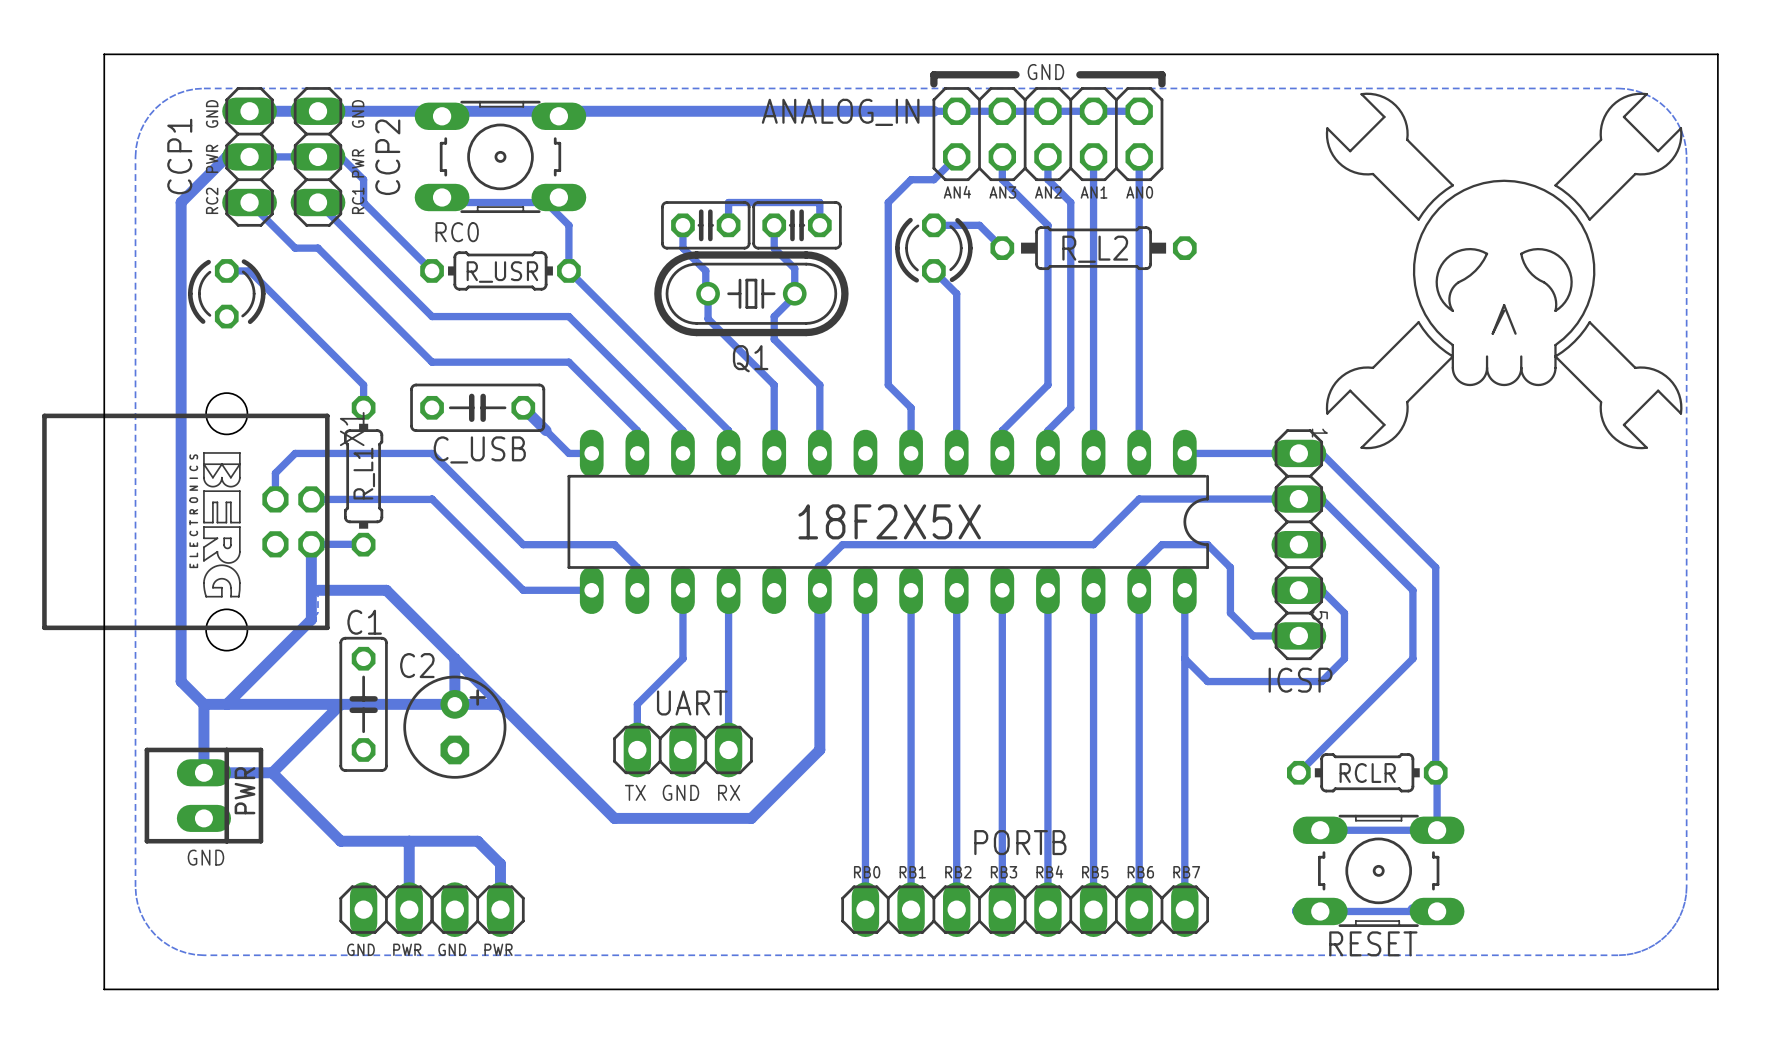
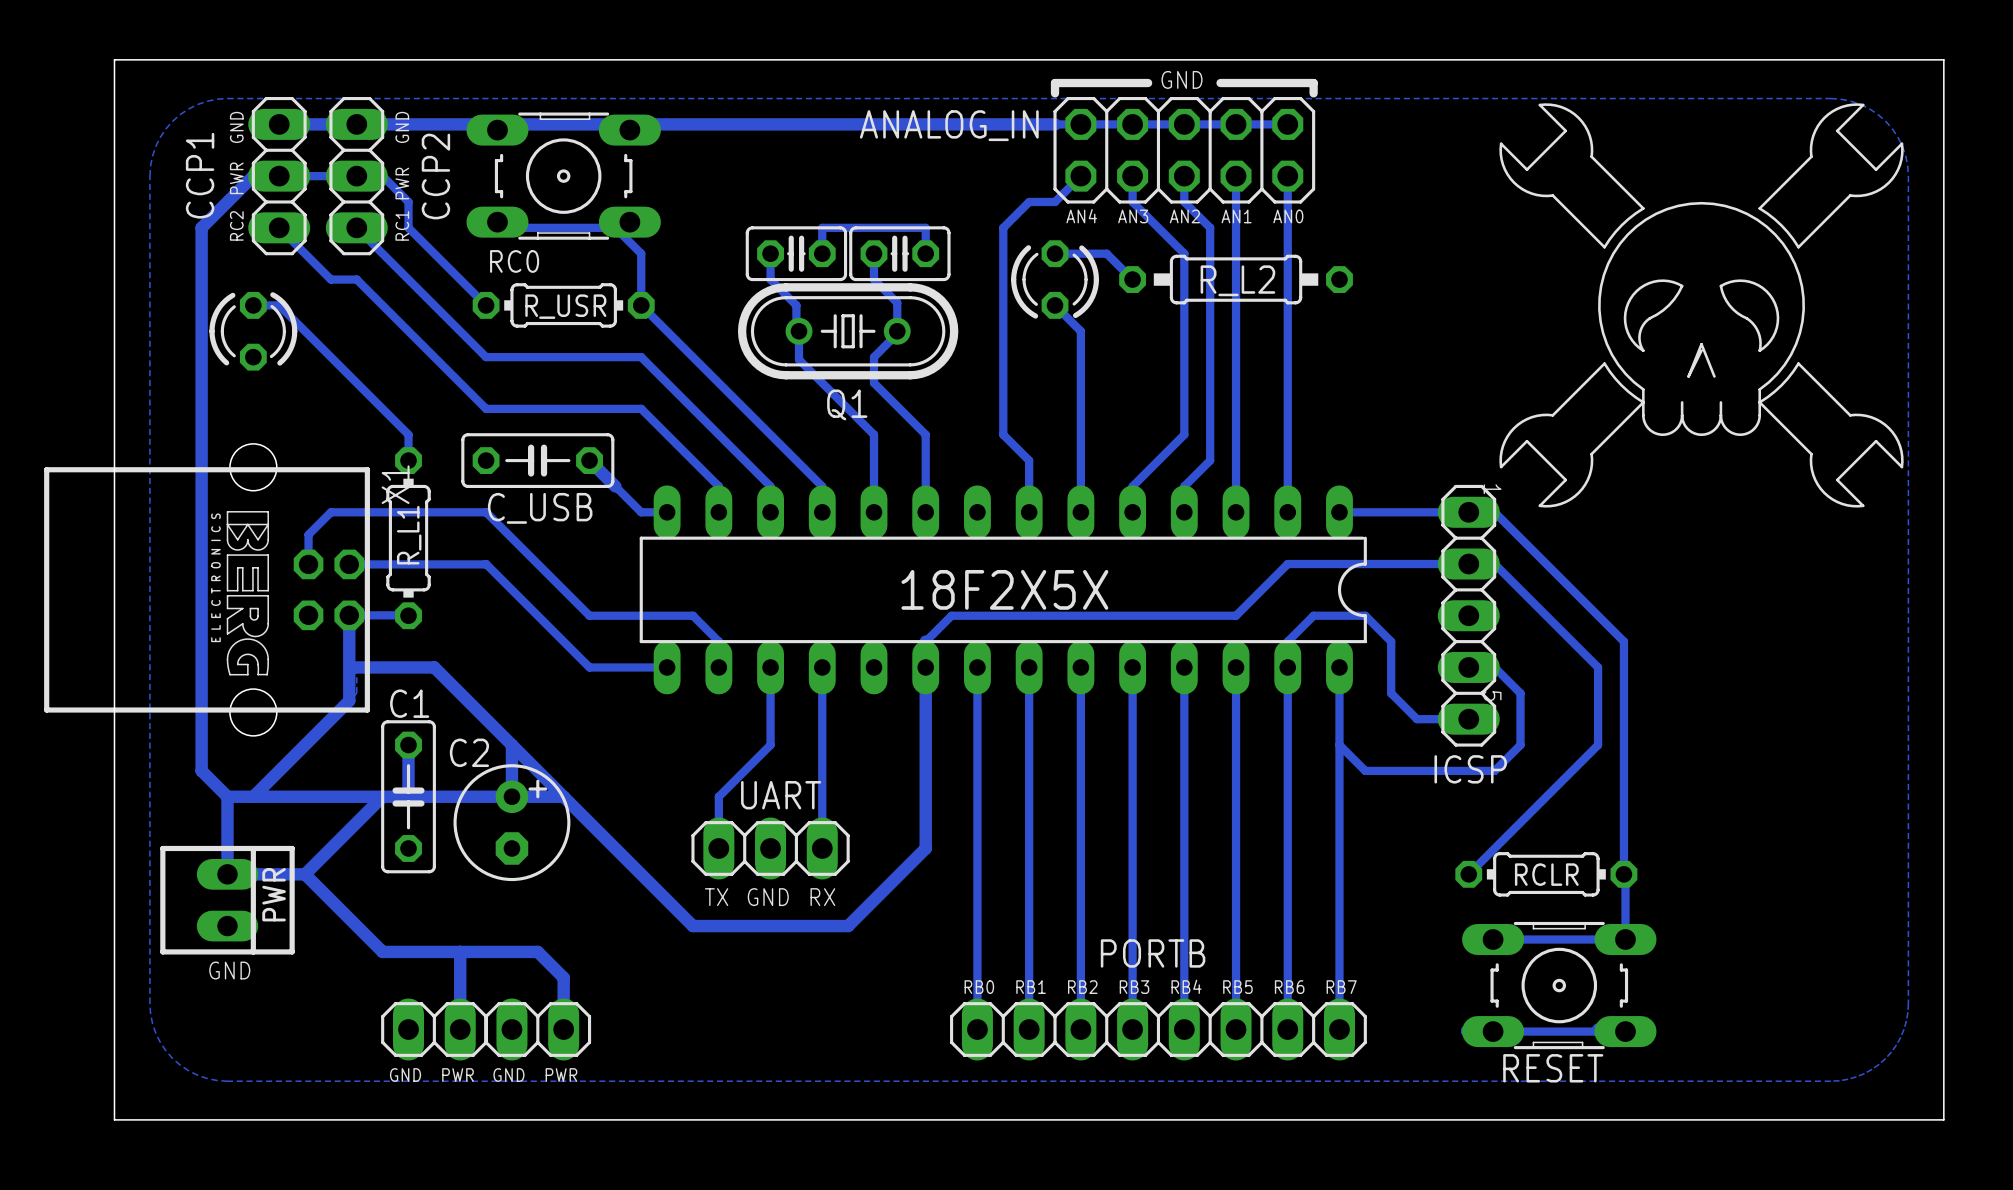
bottom track: none -> (408, 745) (408, 796)

